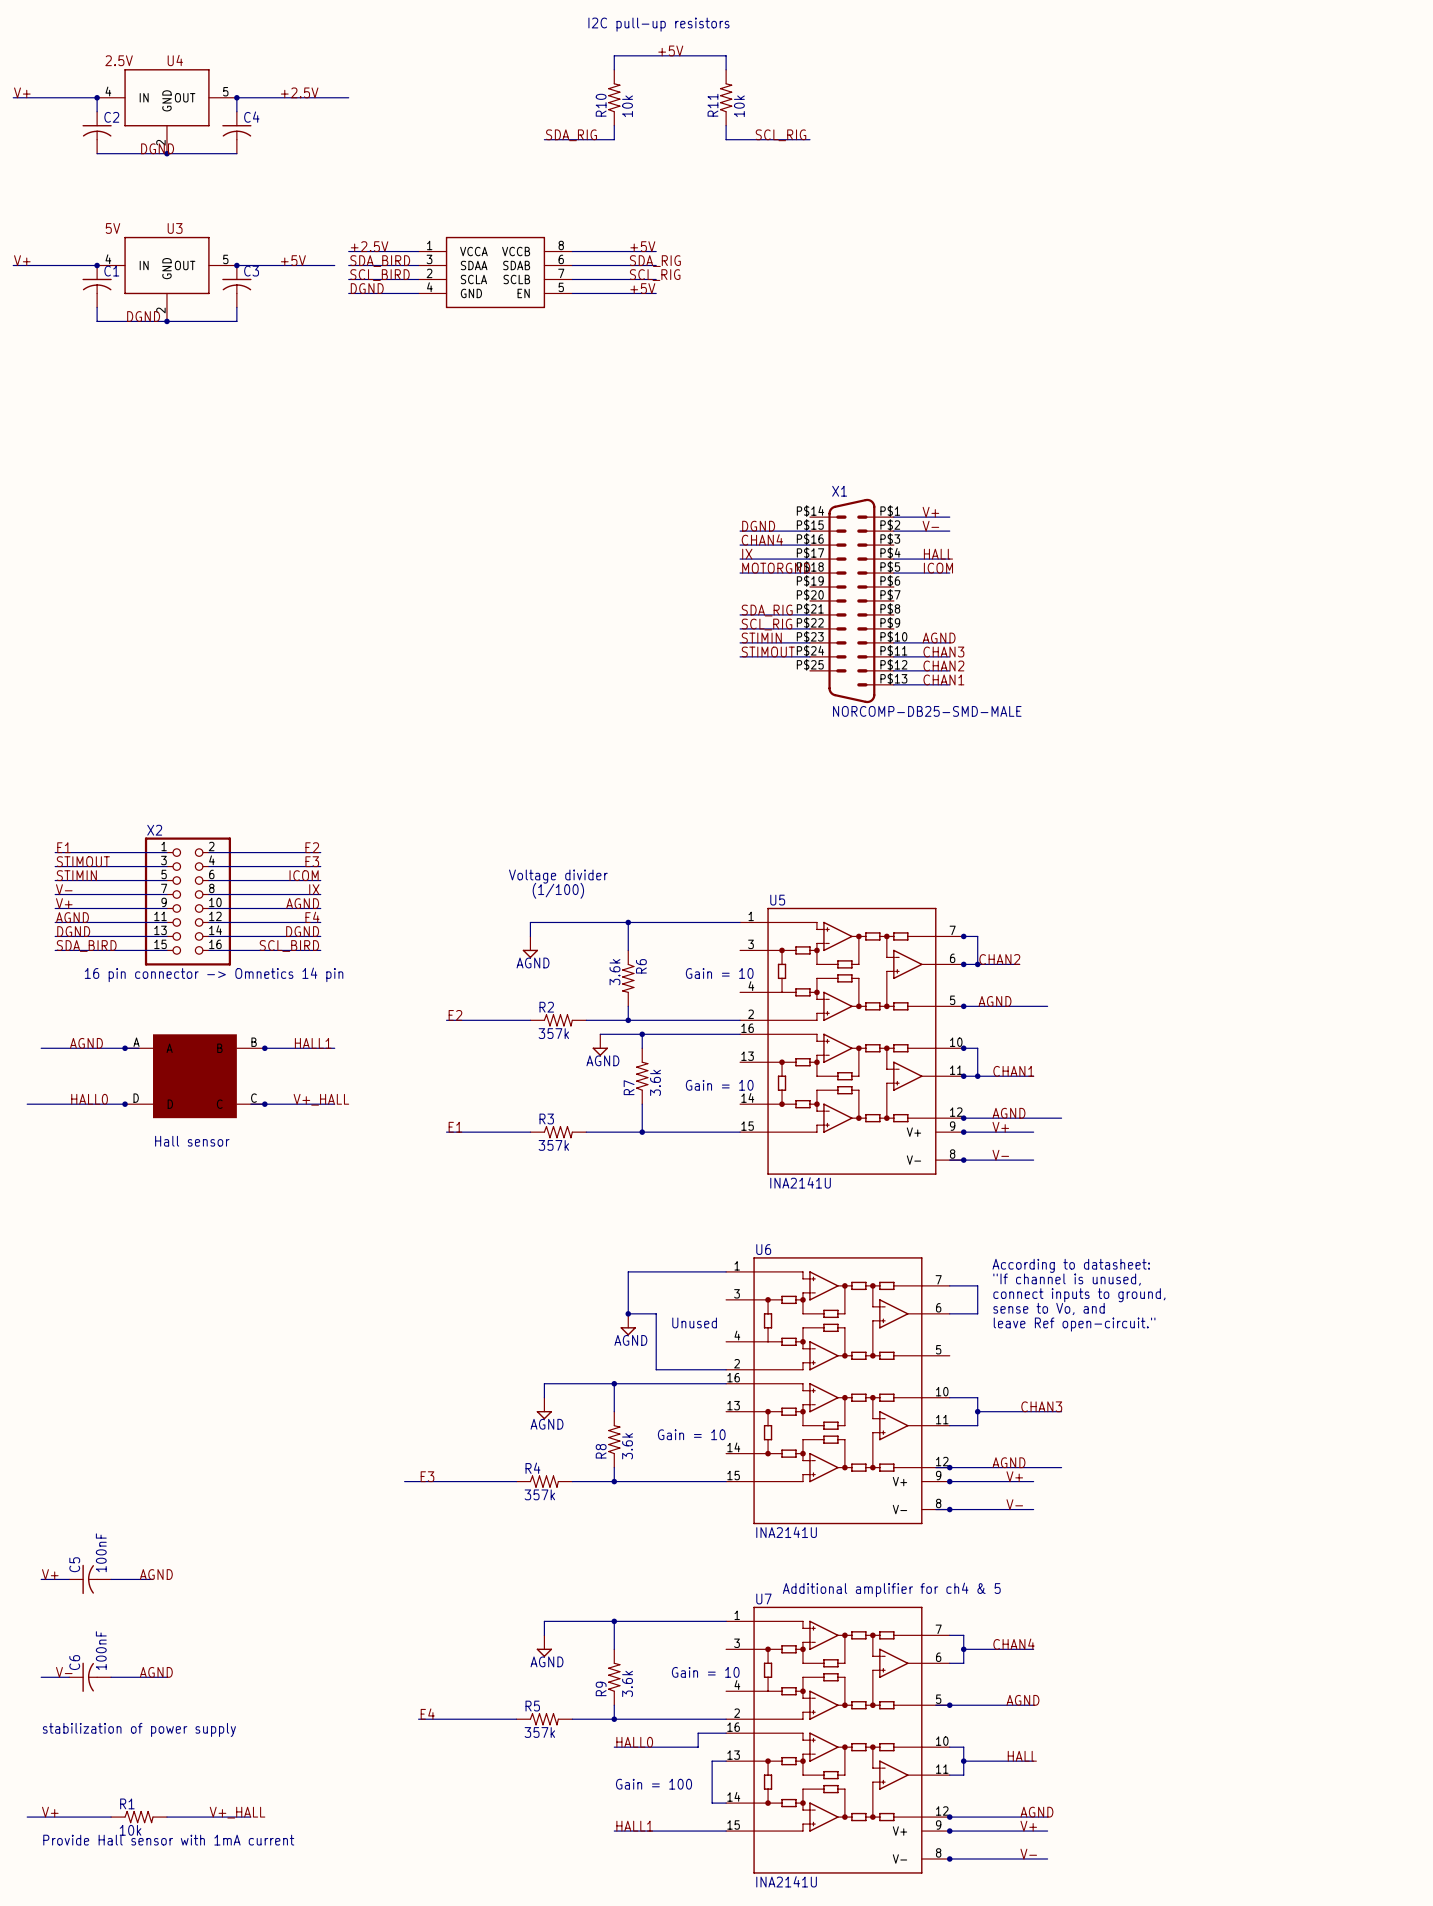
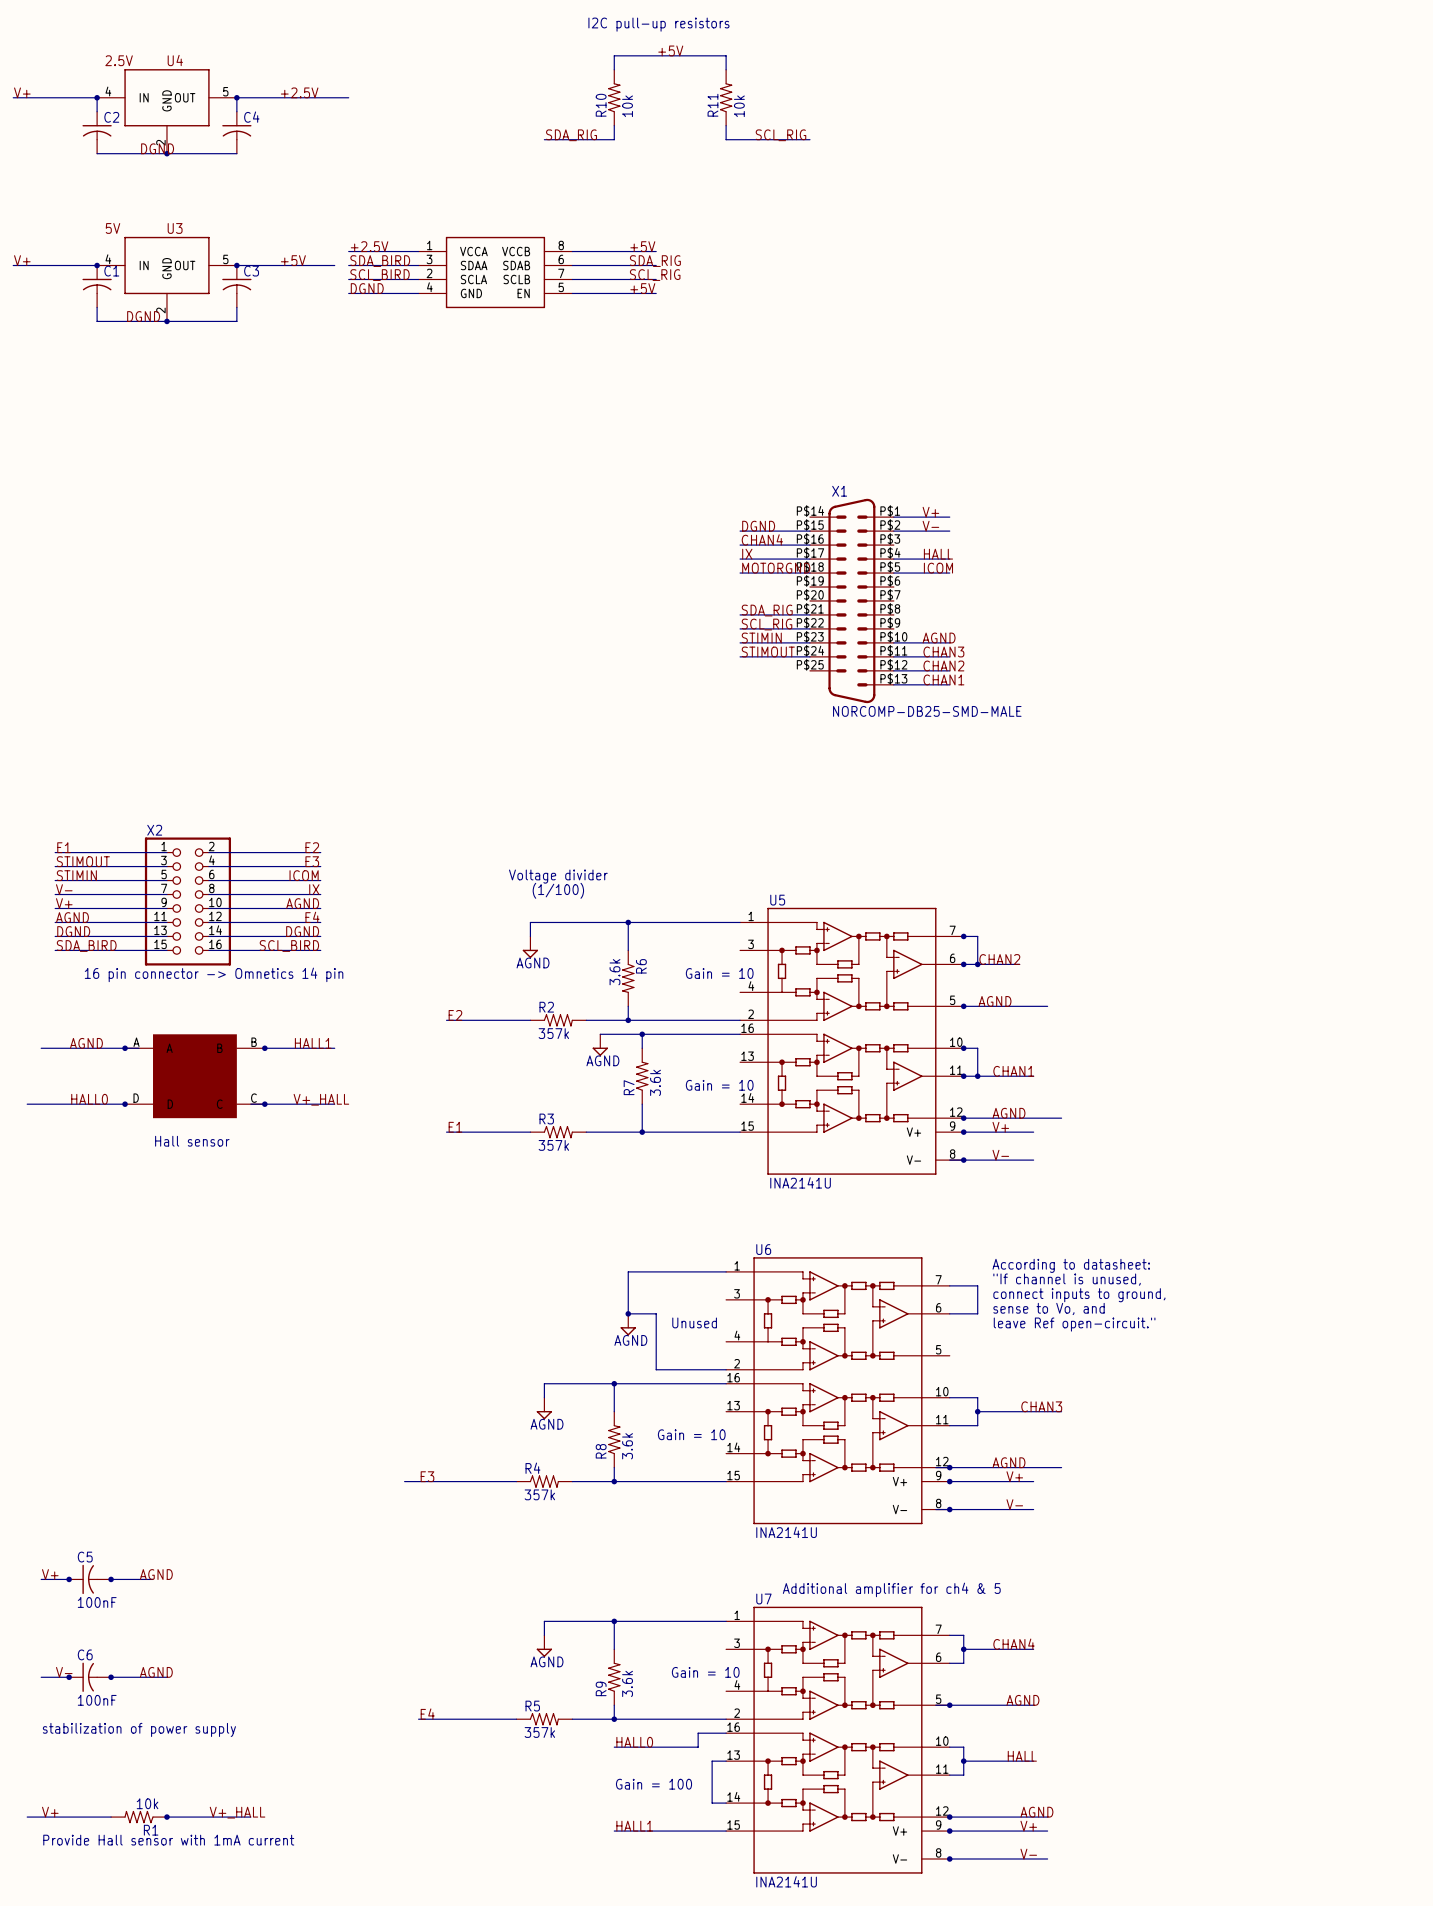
C5 value rotation: 0° (101, 1552) -> 90° clockwise (97, 1602)
C5 value position: 100nF (101, 1552) -> 100nF (97, 1602)
C5 name rotation: 0° (74, 1564) -> 90° clockwise (85, 1557)
junction: none -> (69, 1579)
junction: none -> (111, 1579)
C6 value rotation: 0° (101, 1650) -> 90° clockwise (97, 1700)
C6 value position: 100nF (101, 1650) -> 100nF (97, 1700)
C6 name rotation: 0° (74, 1662) -> 90° clockwise (85, 1654)
junction: none -> (69, 1677)
junction: none -> (111, 1677)
R1 rotation: 0° (139, 1817) -> 180° (139, 1817)
junction: none -> (166, 1817)

